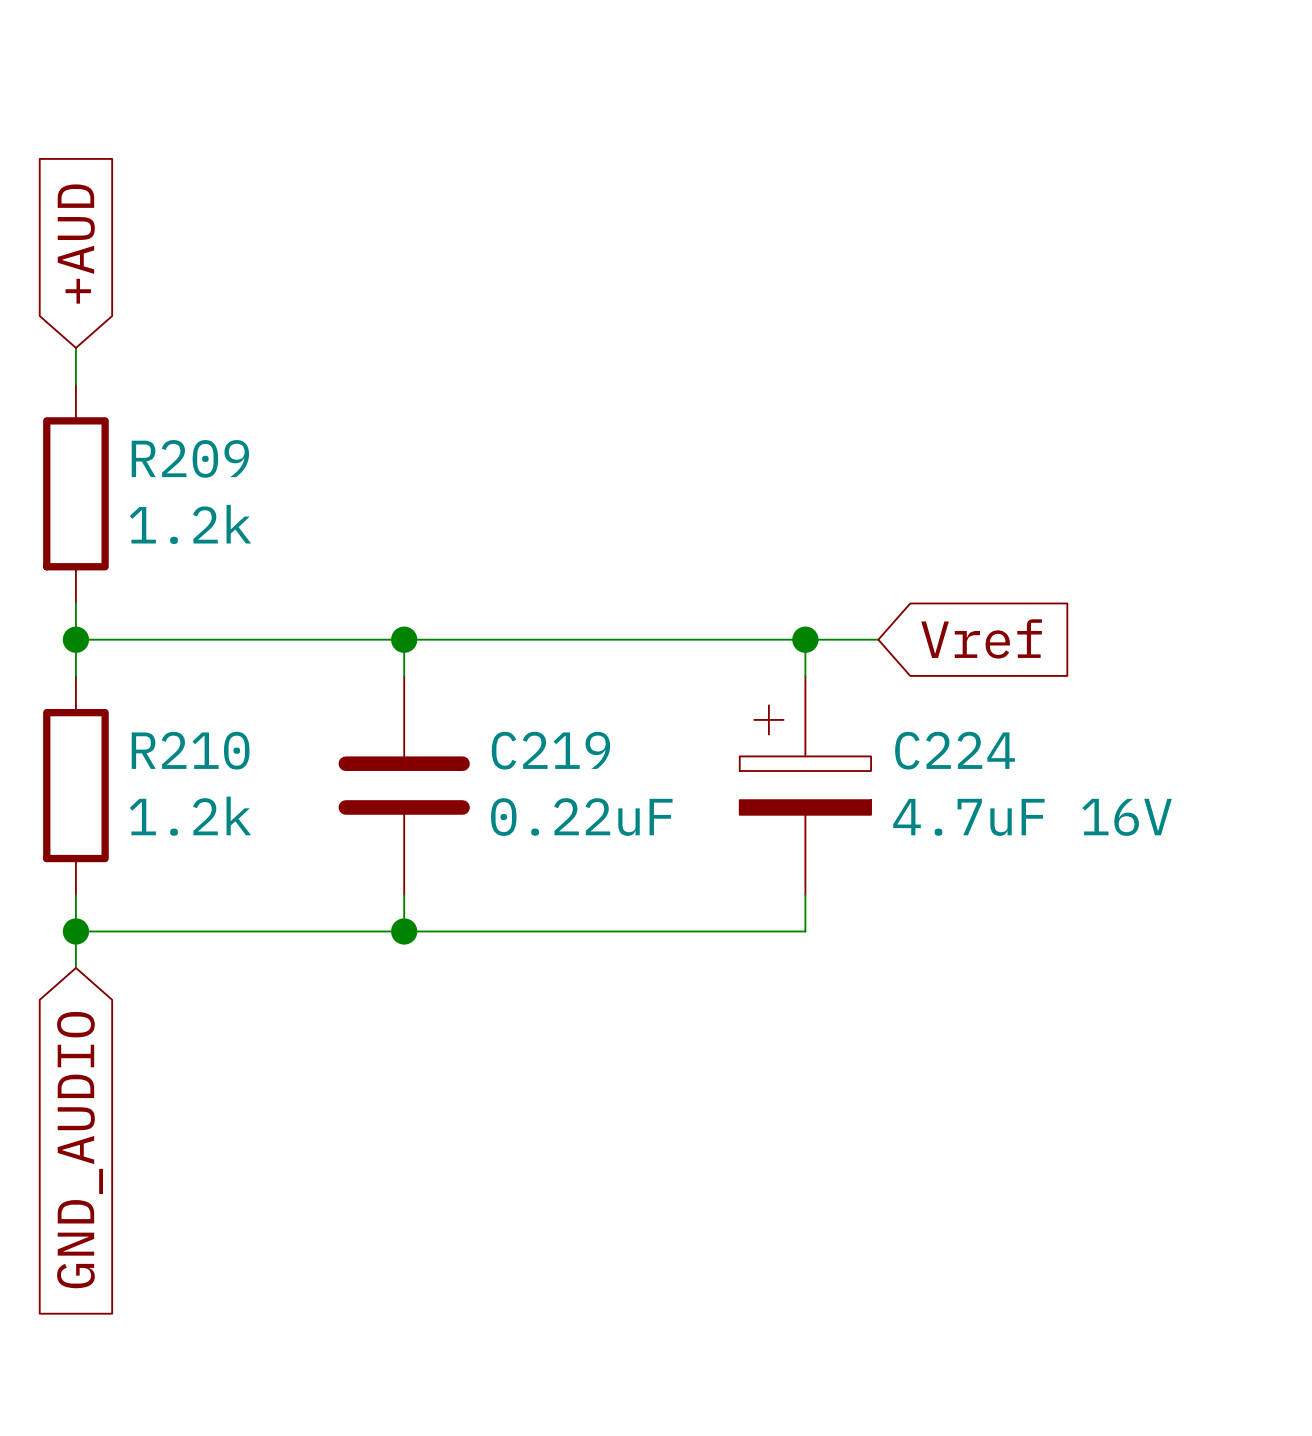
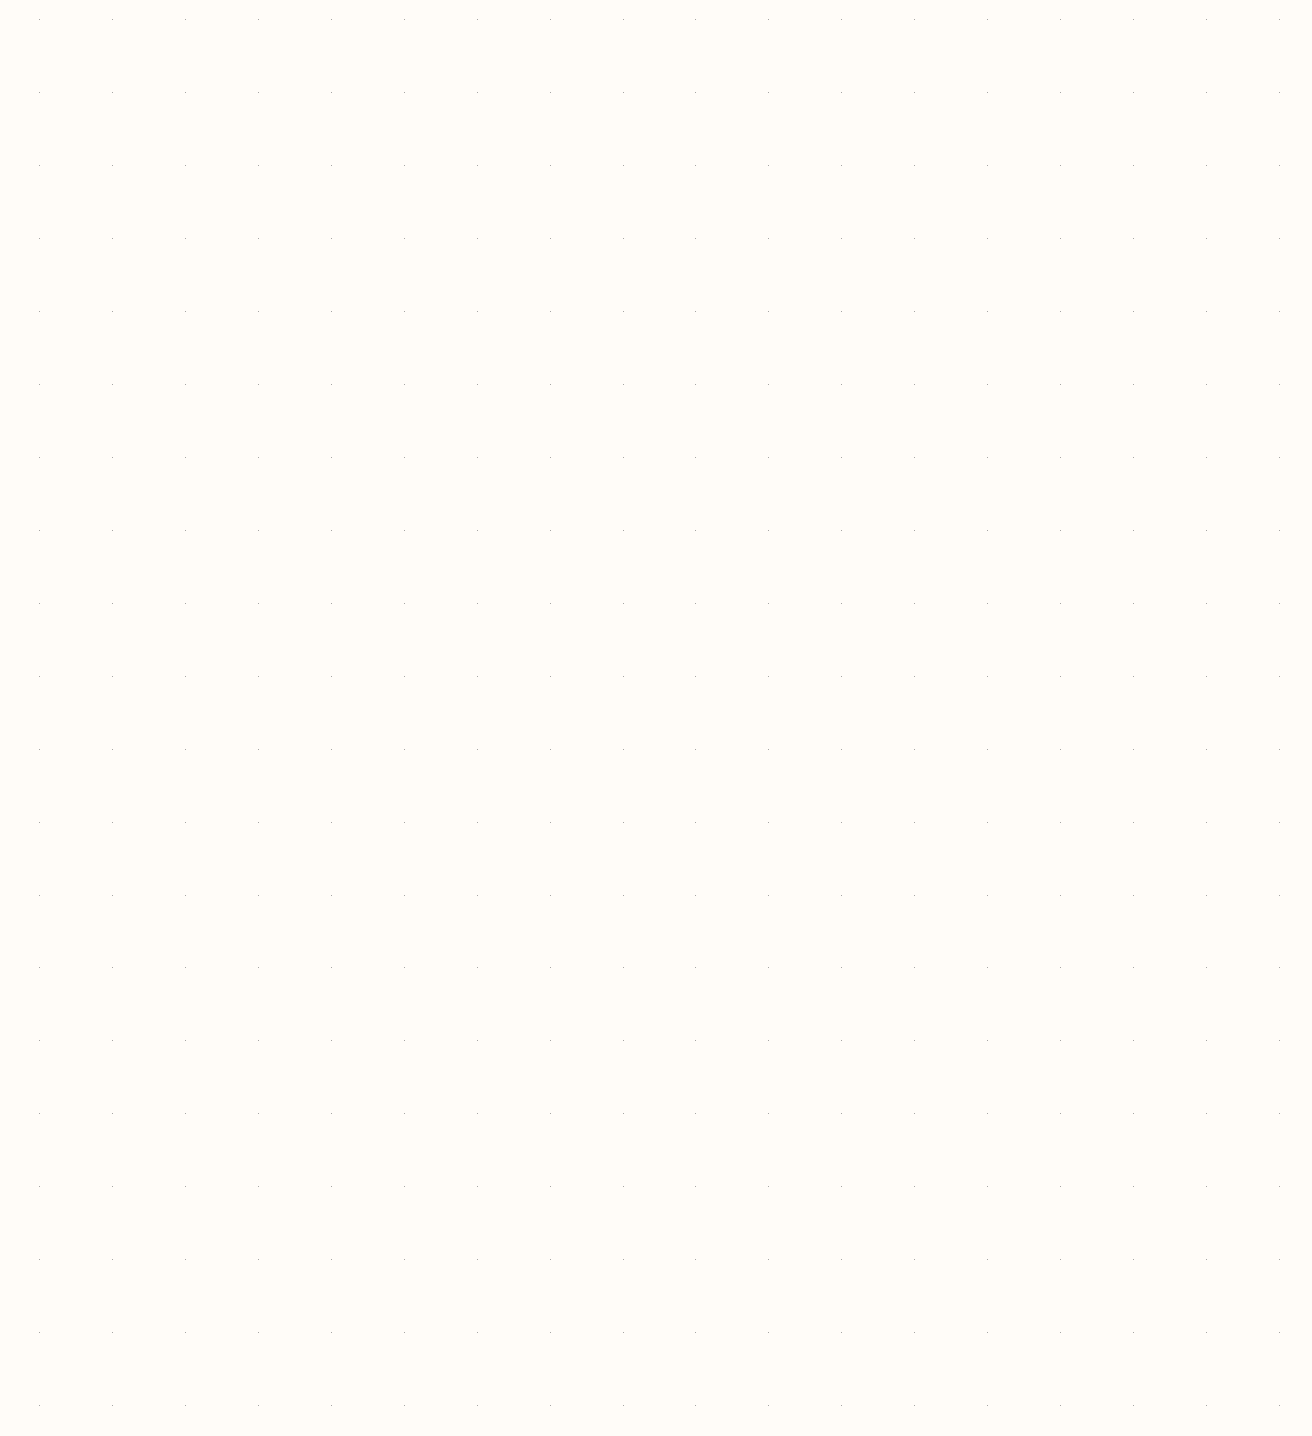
global label: +AUD (76, 244) -> none
wire: (75, 347) (75, 384) -> none
R209: 1.2k (75, 493) -> none
wire: (75, 603) (75, 676) -> none
global label: Vref (981, 638) -> none
wire: (75, 639) (878, 639) -> none
junction: (75, 639) -> none
wire: (404, 639) (404, 676) -> none
junction: (404, 639) -> none
wire: (805, 639) (805, 676) -> none
junction: (805, 639) -> none
R210: 1.2k (75, 785) -> none
C219: 0.22uF (404, 785) -> none
C224: 4.7uF 16V (805, 785) -> none
wire: (75, 895) (75, 967) -> none
wire: (404, 895) (404, 931) -> none
wire: (805, 895) (805, 931) (75, 931) -> none
junction: (75, 931) -> none
junction: (404, 931) -> none
global label: GND_AUDIO (80, 1150) -> none

